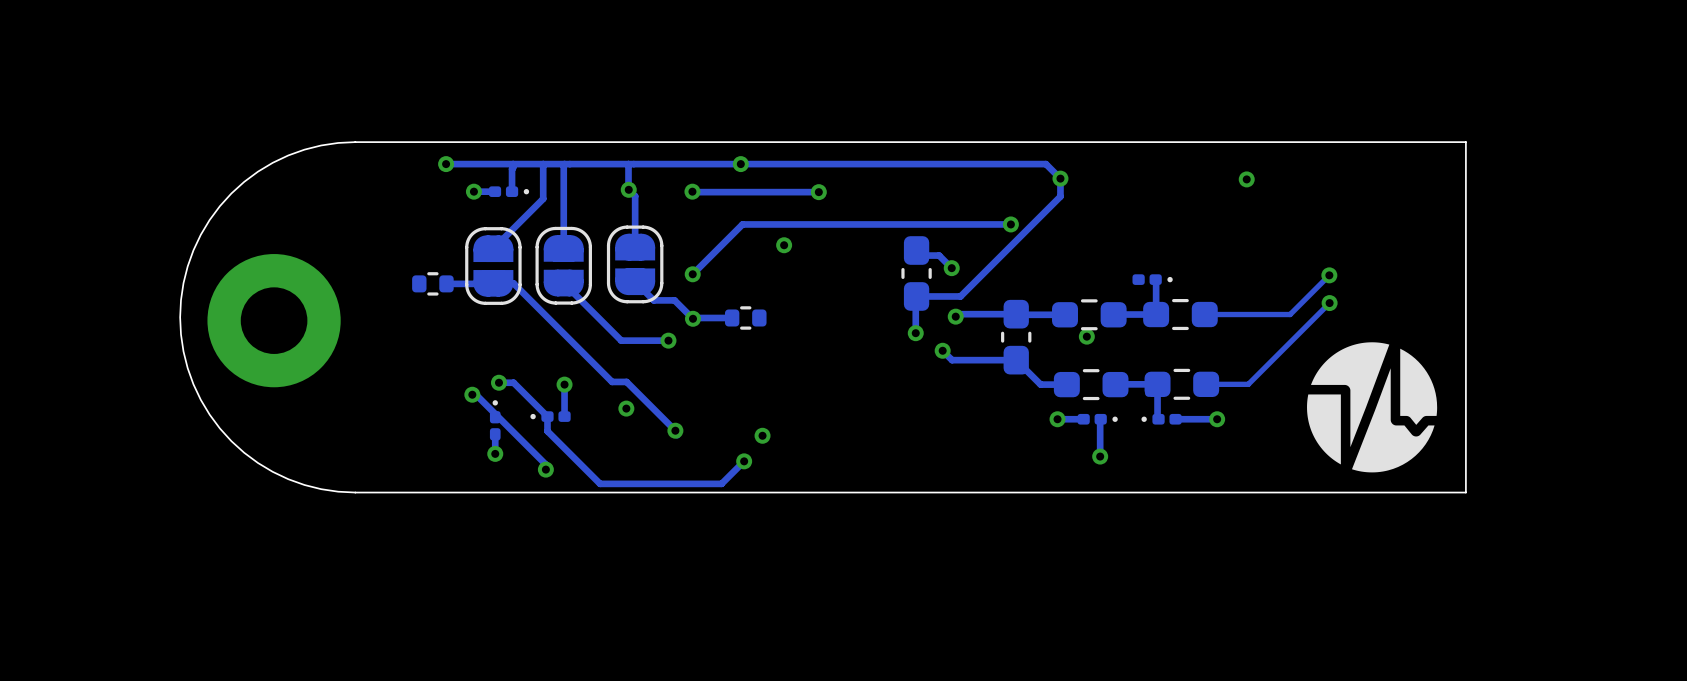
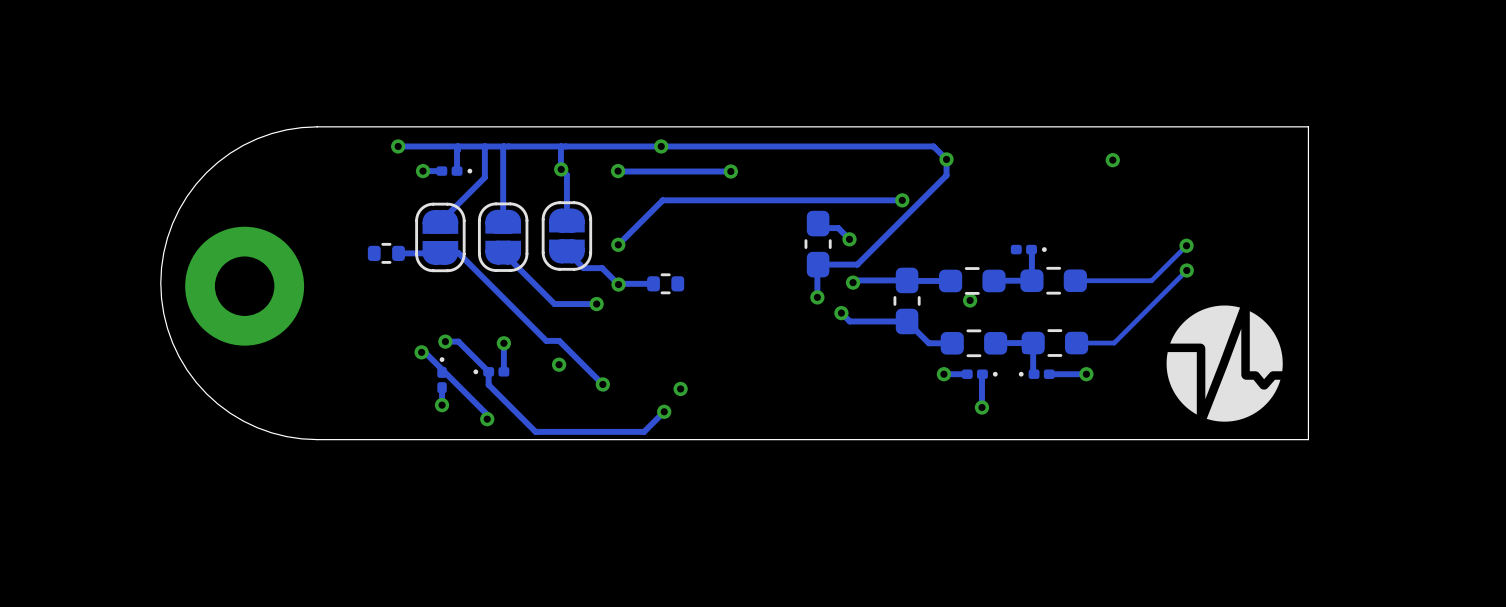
via: (784, 245) -> none

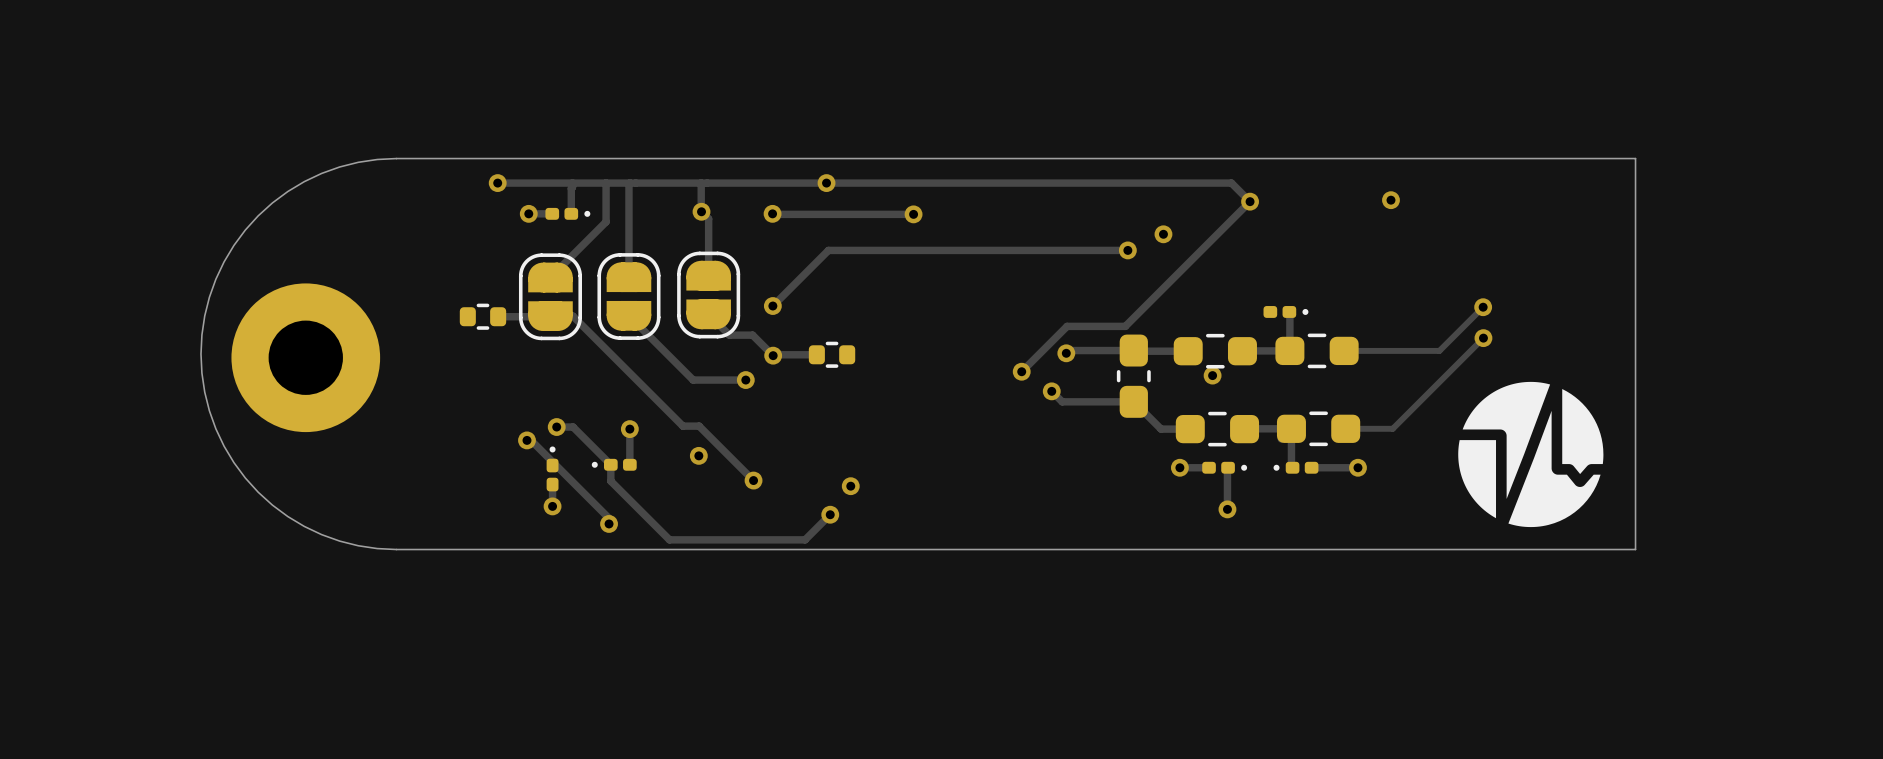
track: (933, 146) (946, 159) (946, 175) (857, 264) (818, 264) -> (1166, 183) (1231, 183) (1250, 201) (1125, 326) (1067, 326) (1021, 371)
via: (946, 159) -> none
via: none -> (1250, 201)
via: none -> (1163, 234)
track: (818, 228) (838, 228) (849, 239) -> none
via: (849, 239) -> none
part: (818, 244) -> none
track: (818, 269) (817, 297) -> none

